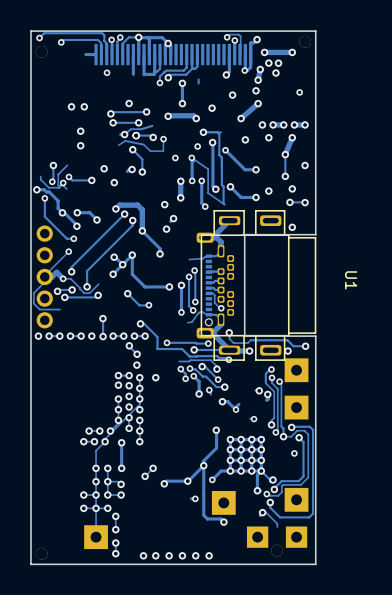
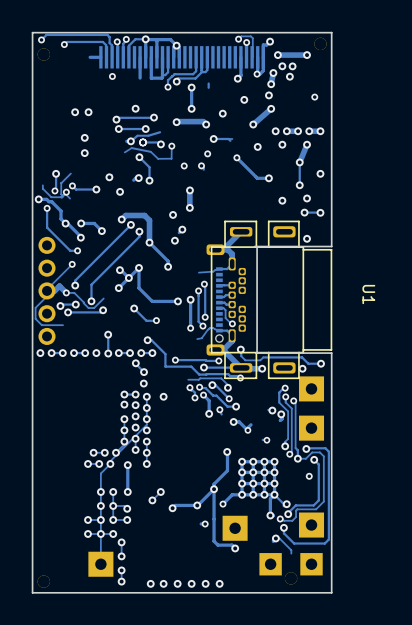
track: (219, 134) (223, 203) -> none
track: (212, 142) (212, 186) (215, 189) -> none
via: (212, 142) -> none
track: (191, 157) (208, 169) (208, 193) (224, 204) -> none
track: (192, 158) (192, 180) -> none
via: (192, 180) -> none
track: (201, 180) (201, 203) (205, 206) -> none
via: (201, 180) -> none
track: (230, 186) (241, 197) (256, 197) -> none
via: (230, 186) -> none
via: (215, 189) -> none
via: (256, 197) -> none
via: (205, 206) -> none

